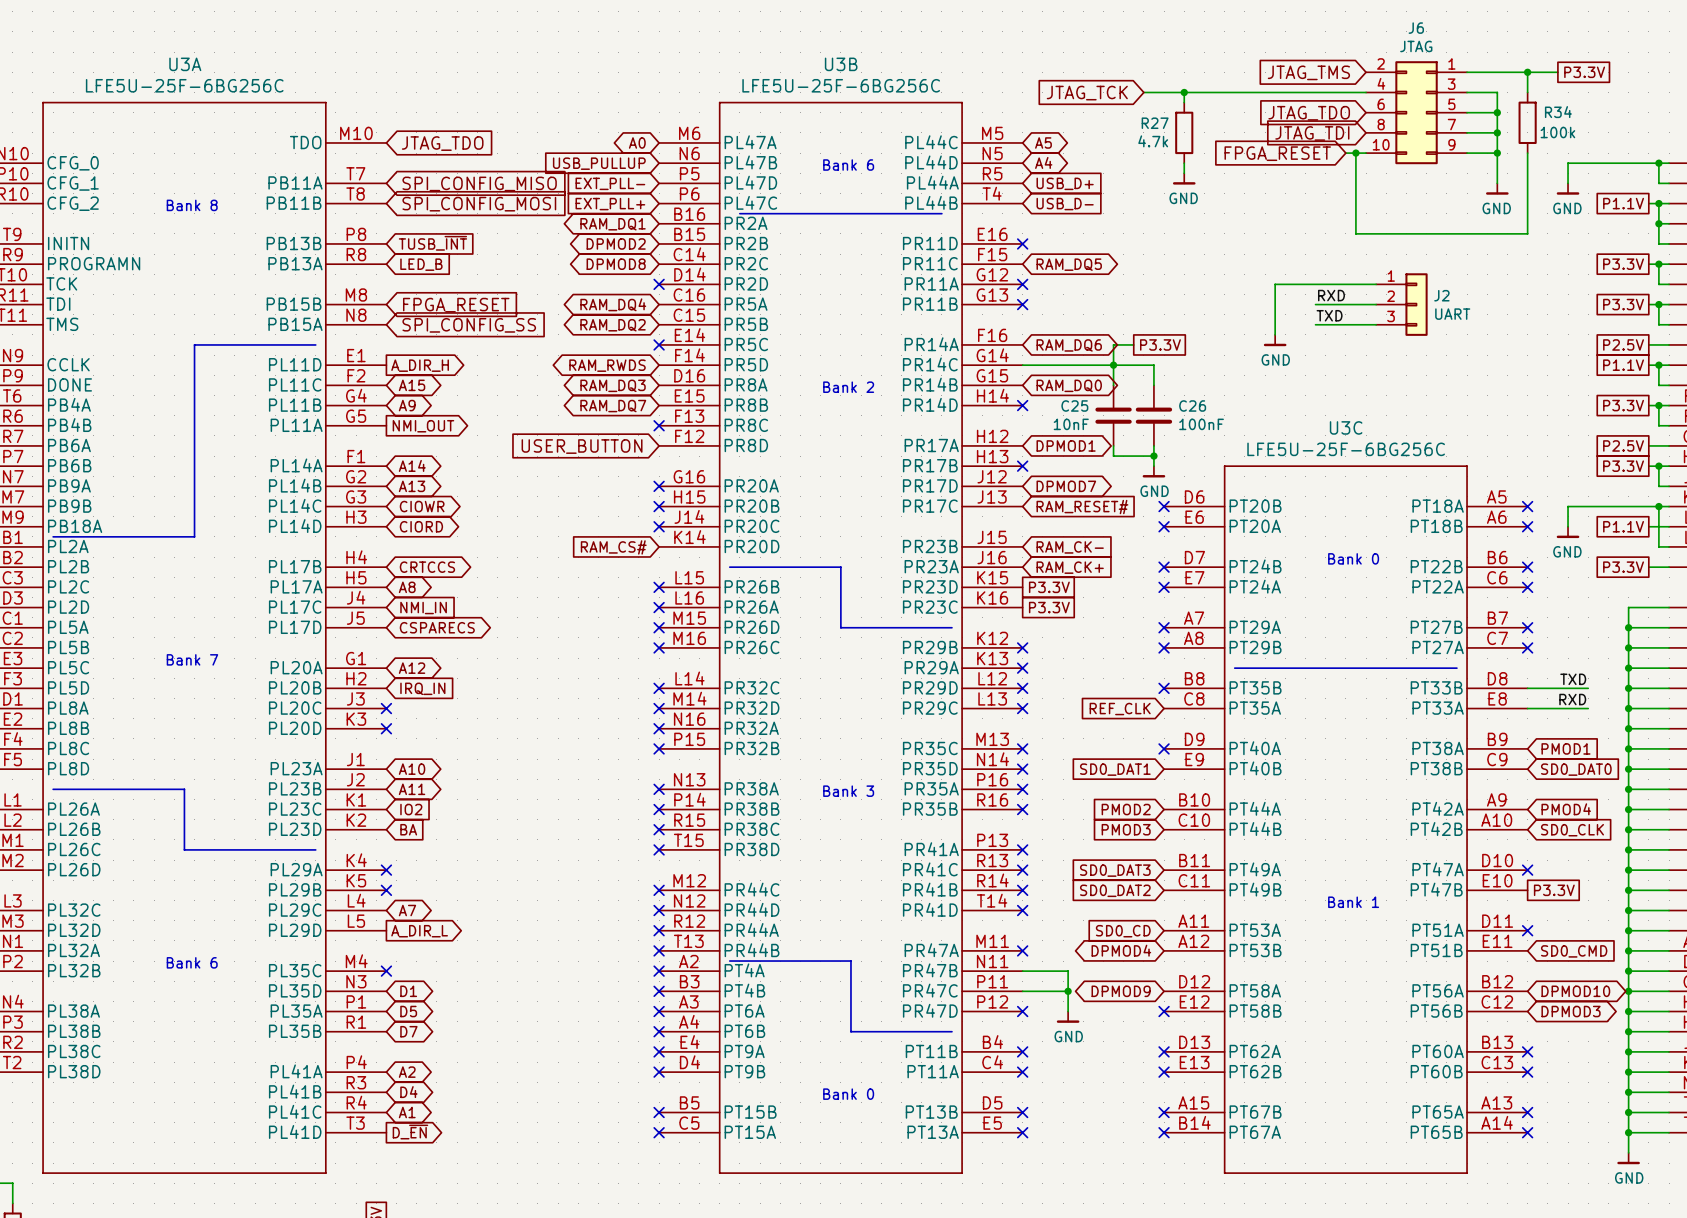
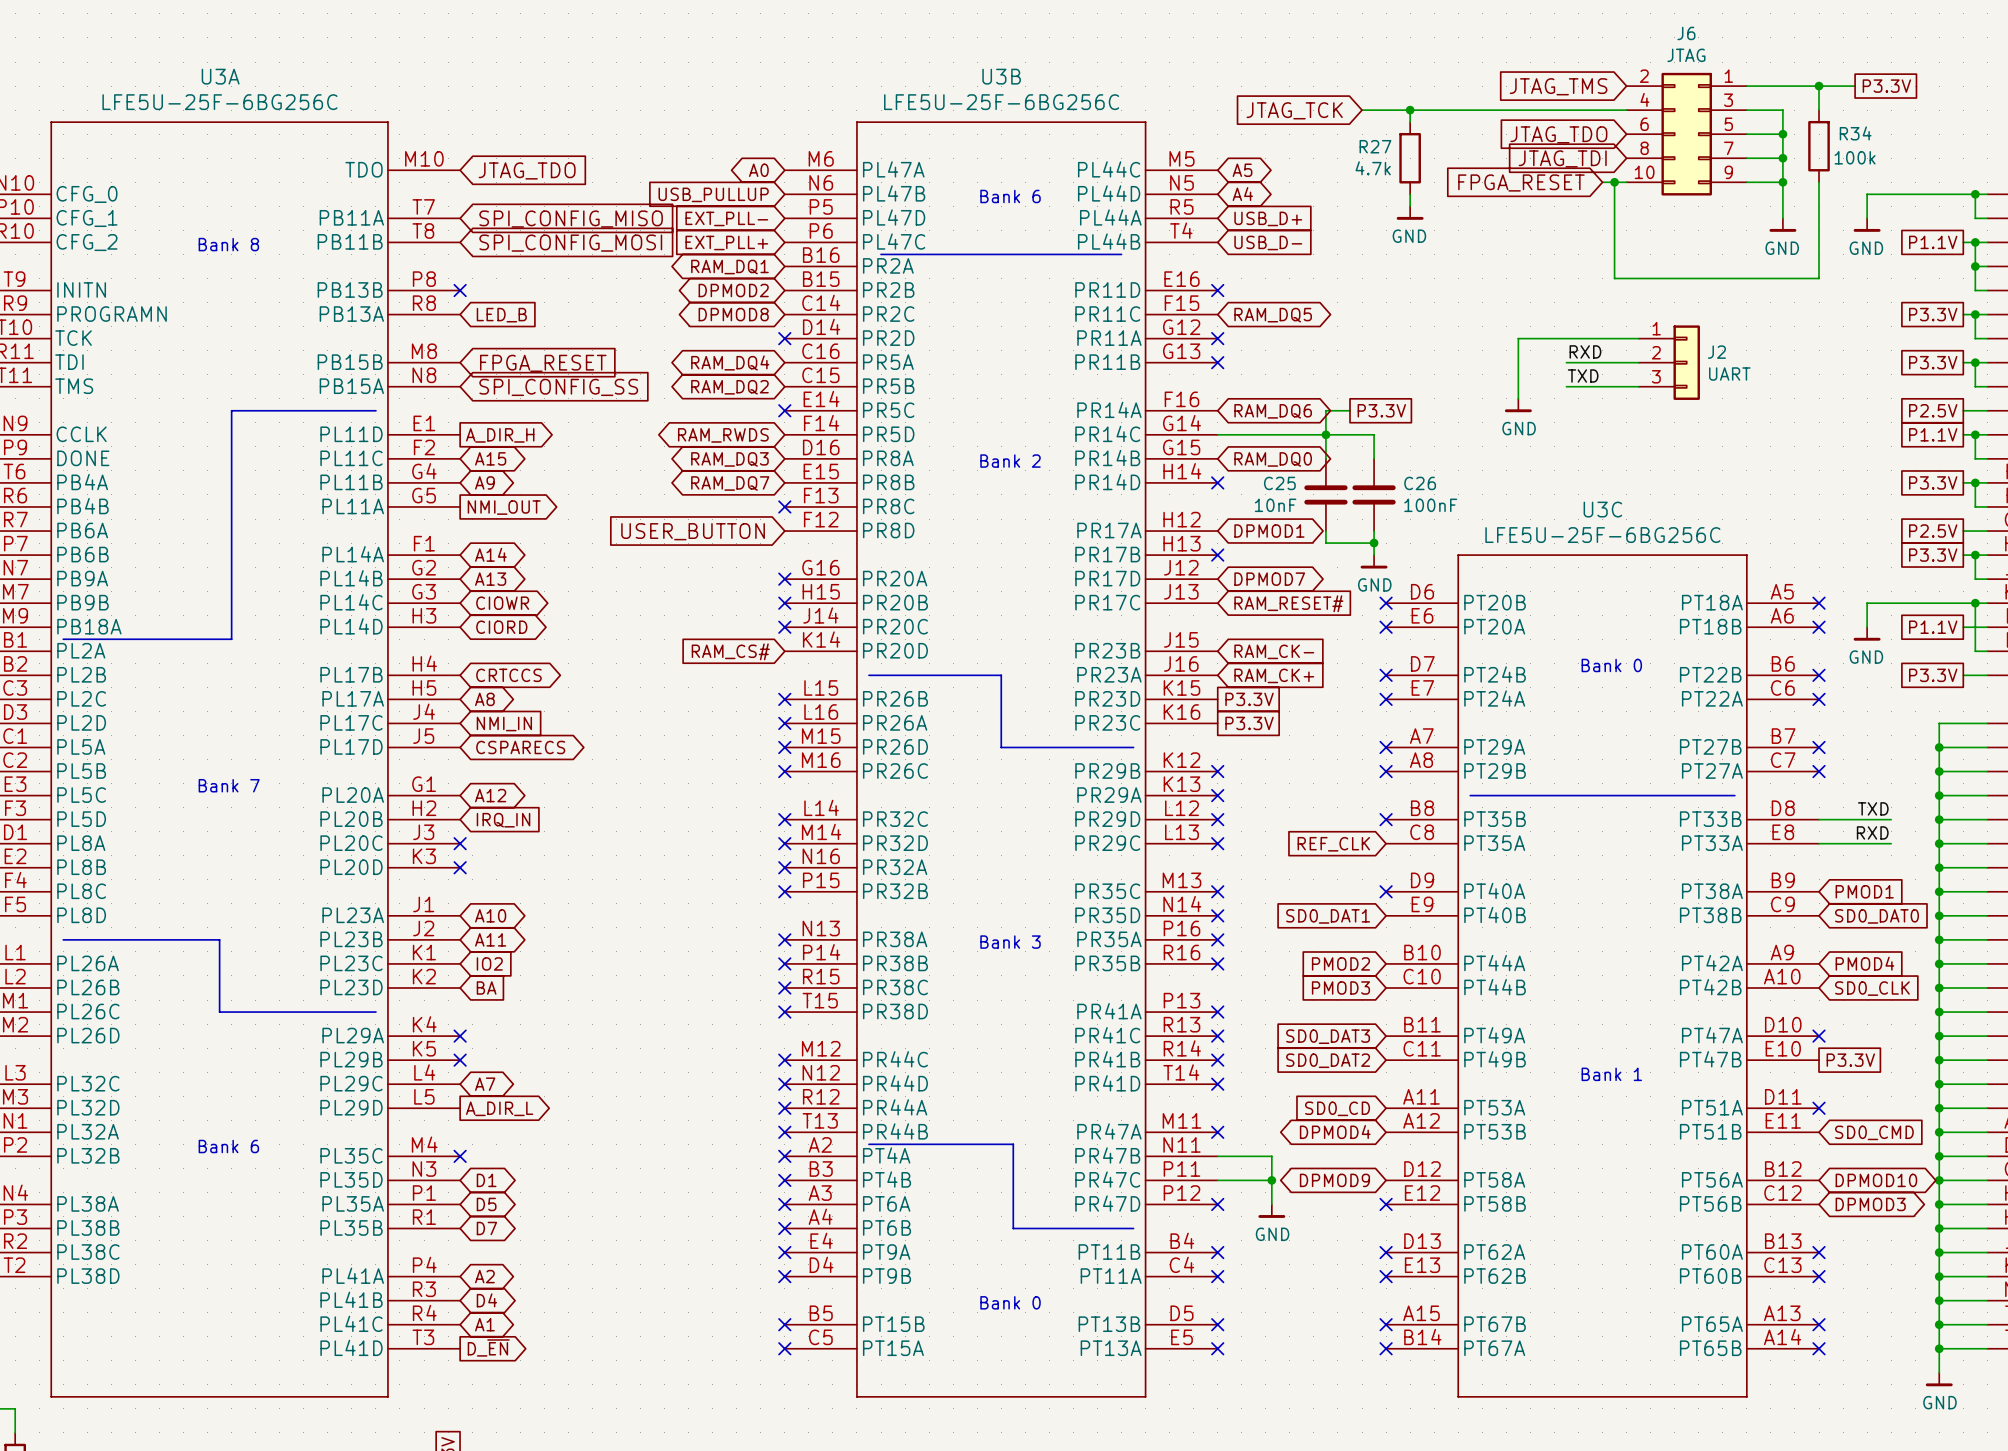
no-connect mark: none -> (460, 290)
global label: TUSB_~{INT} (432, 243) -> none

